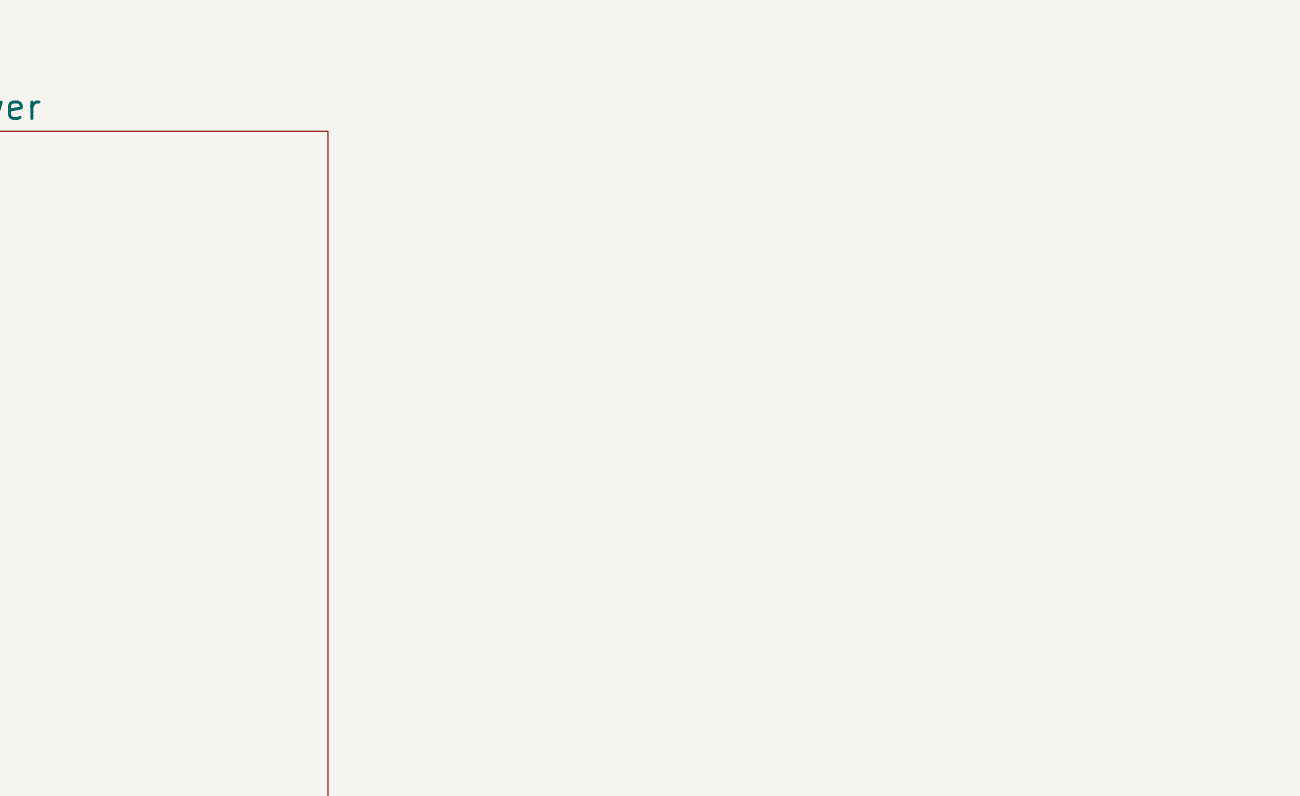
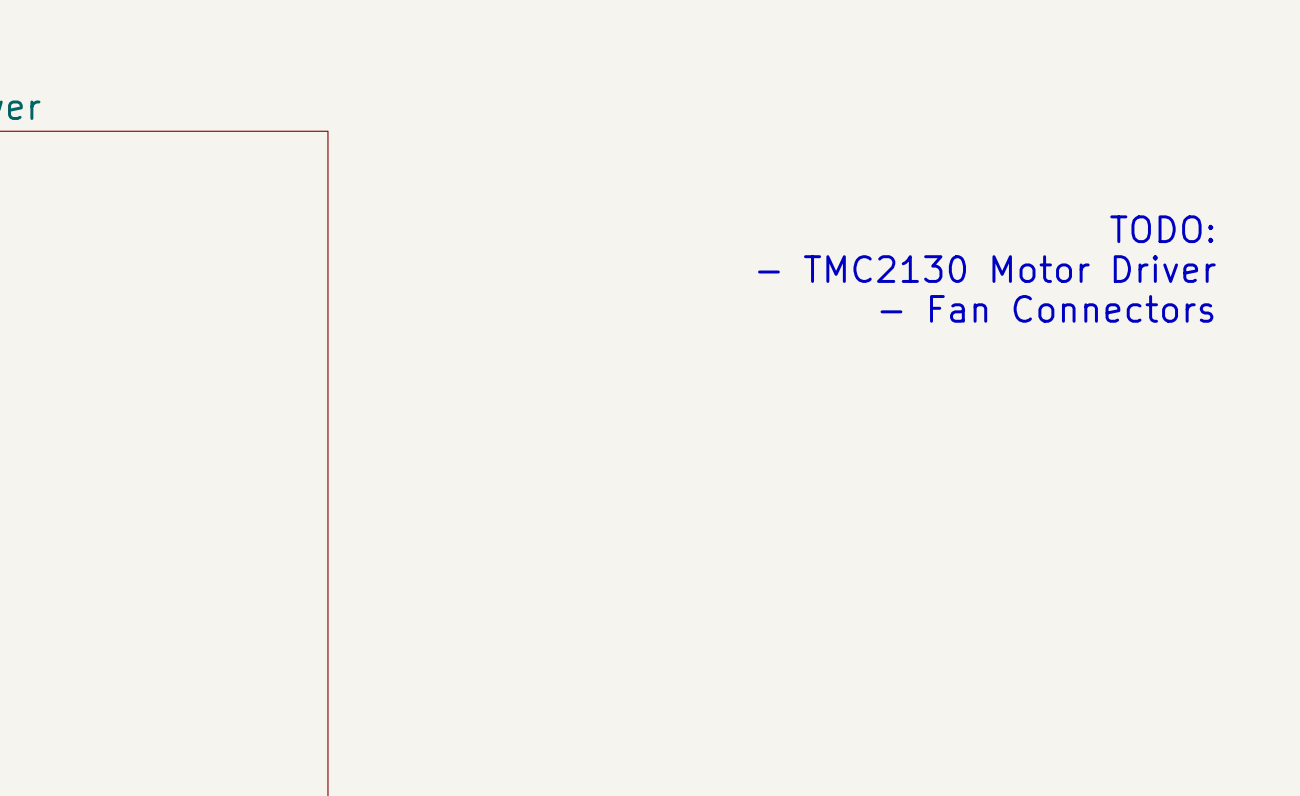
text: none -> TODO: (1161, 229)
text: none -> - TMC2130 Motor Driver (986, 269)
text: none -> - Fan Connectors (1046, 308)

